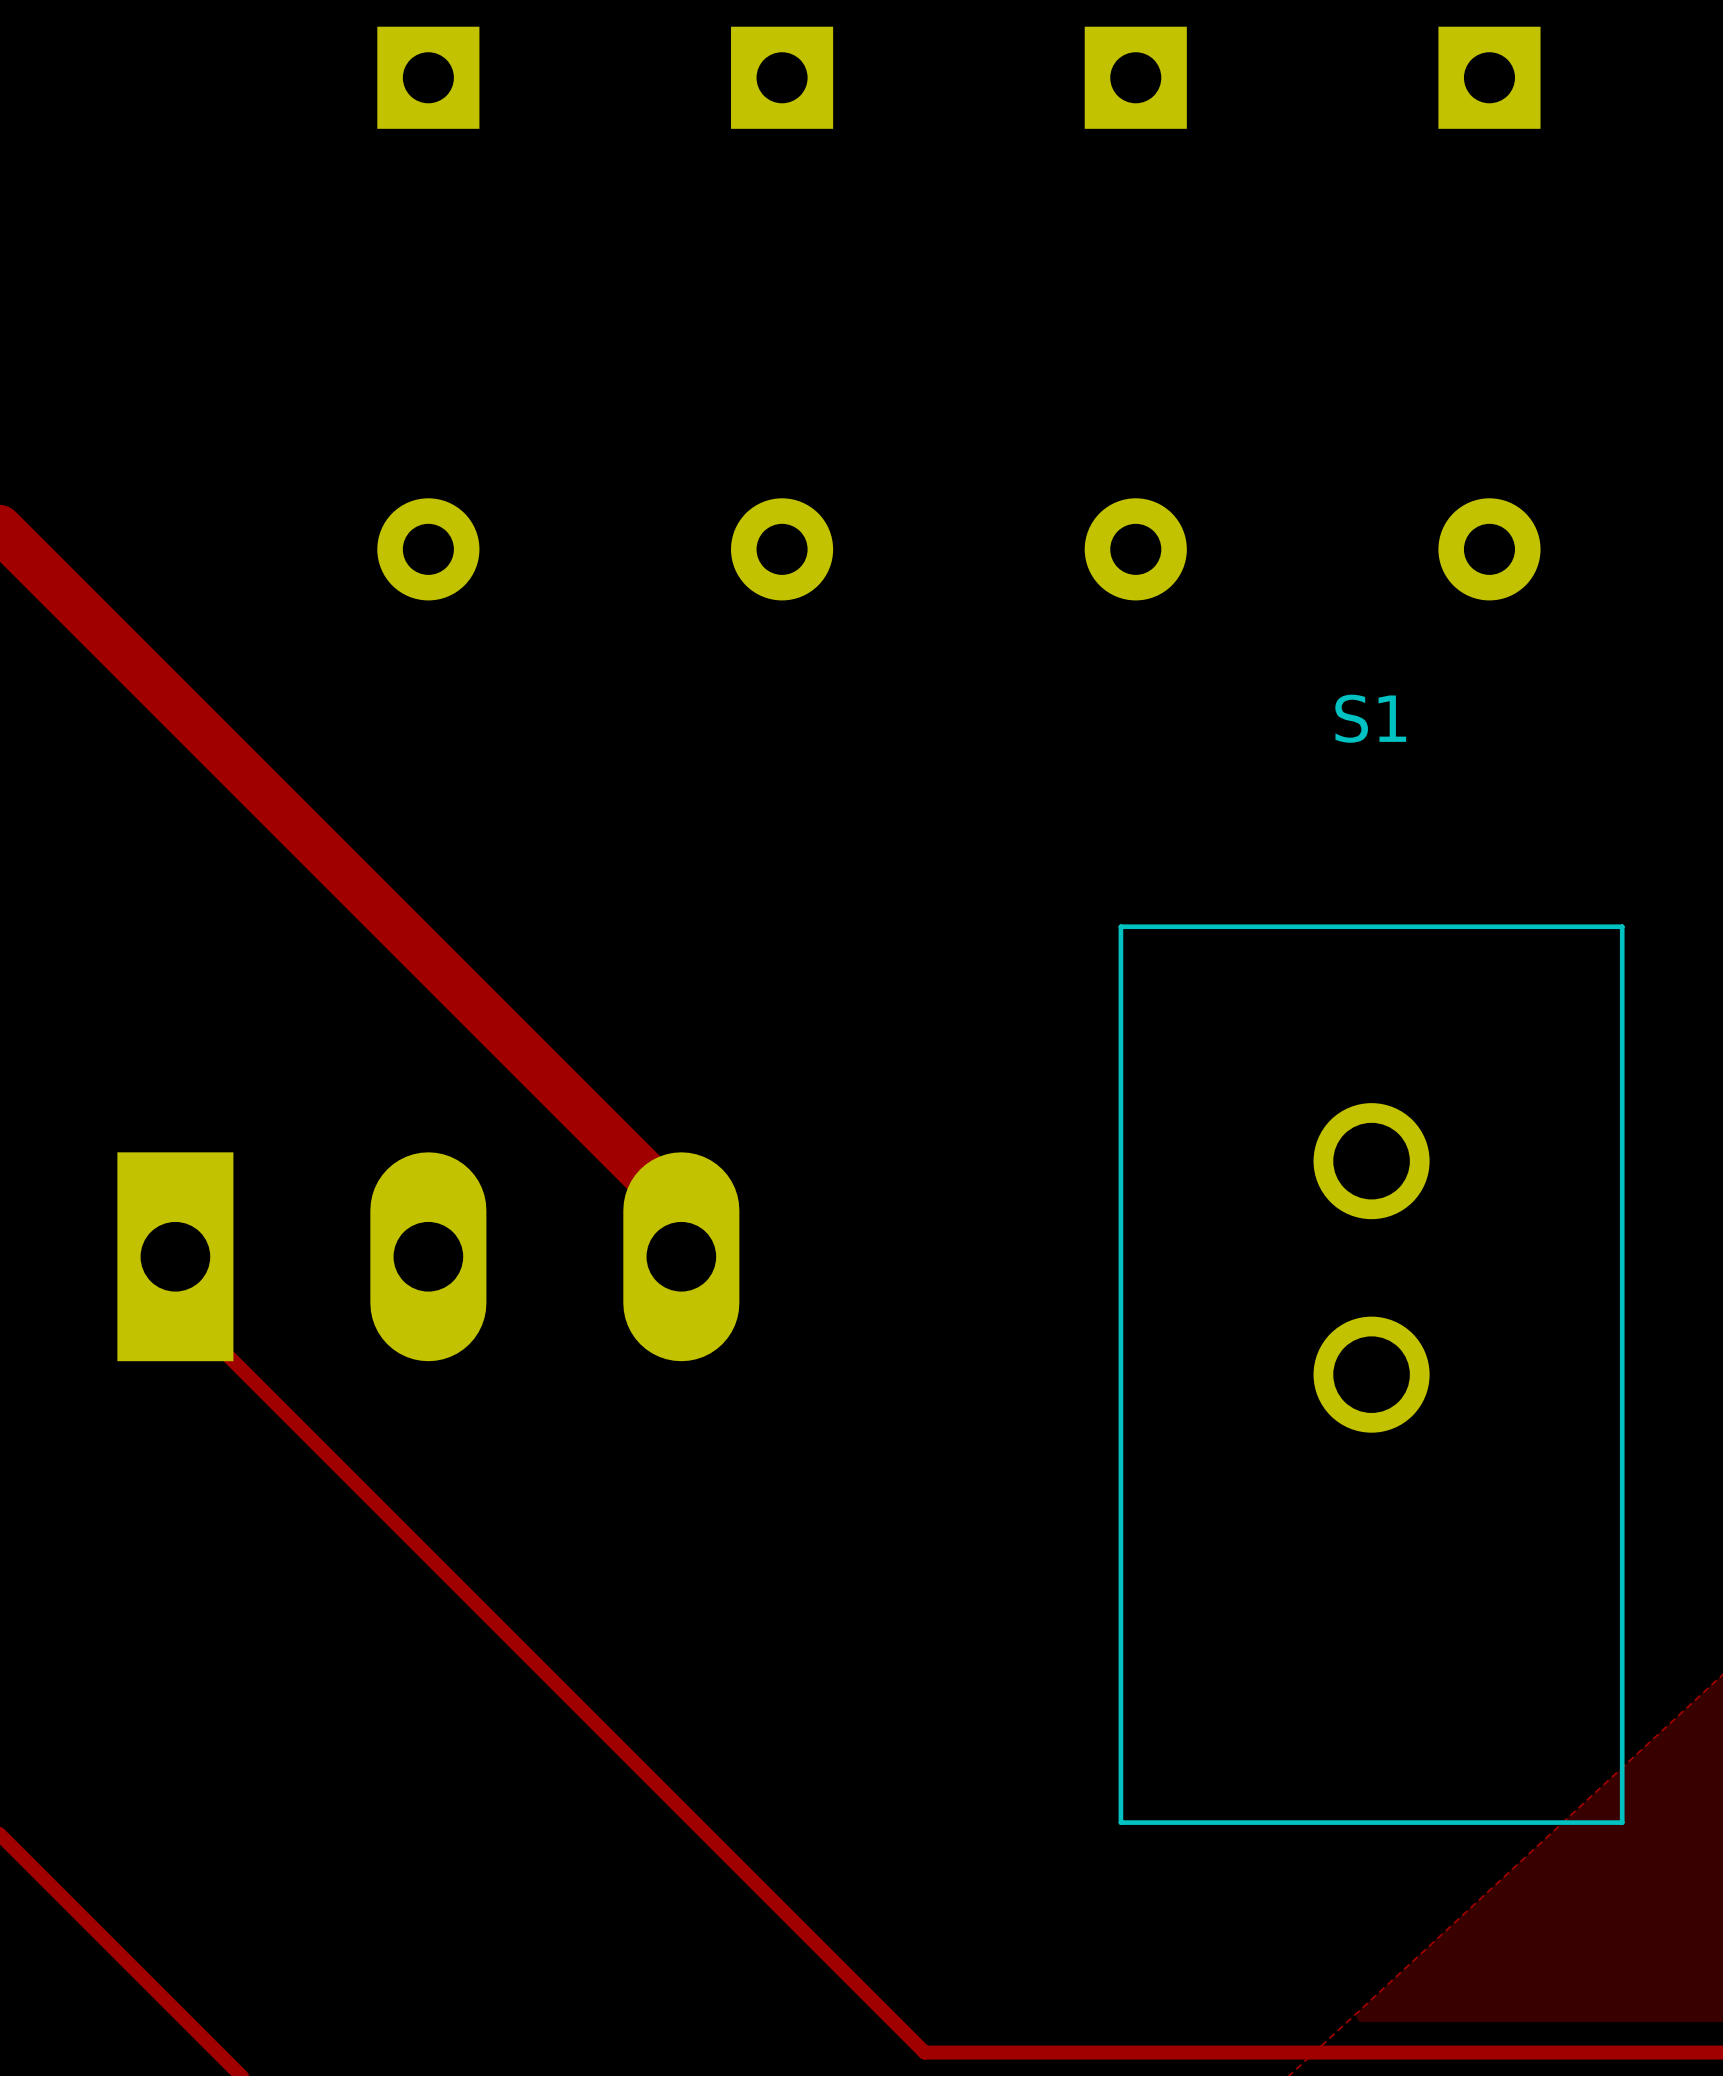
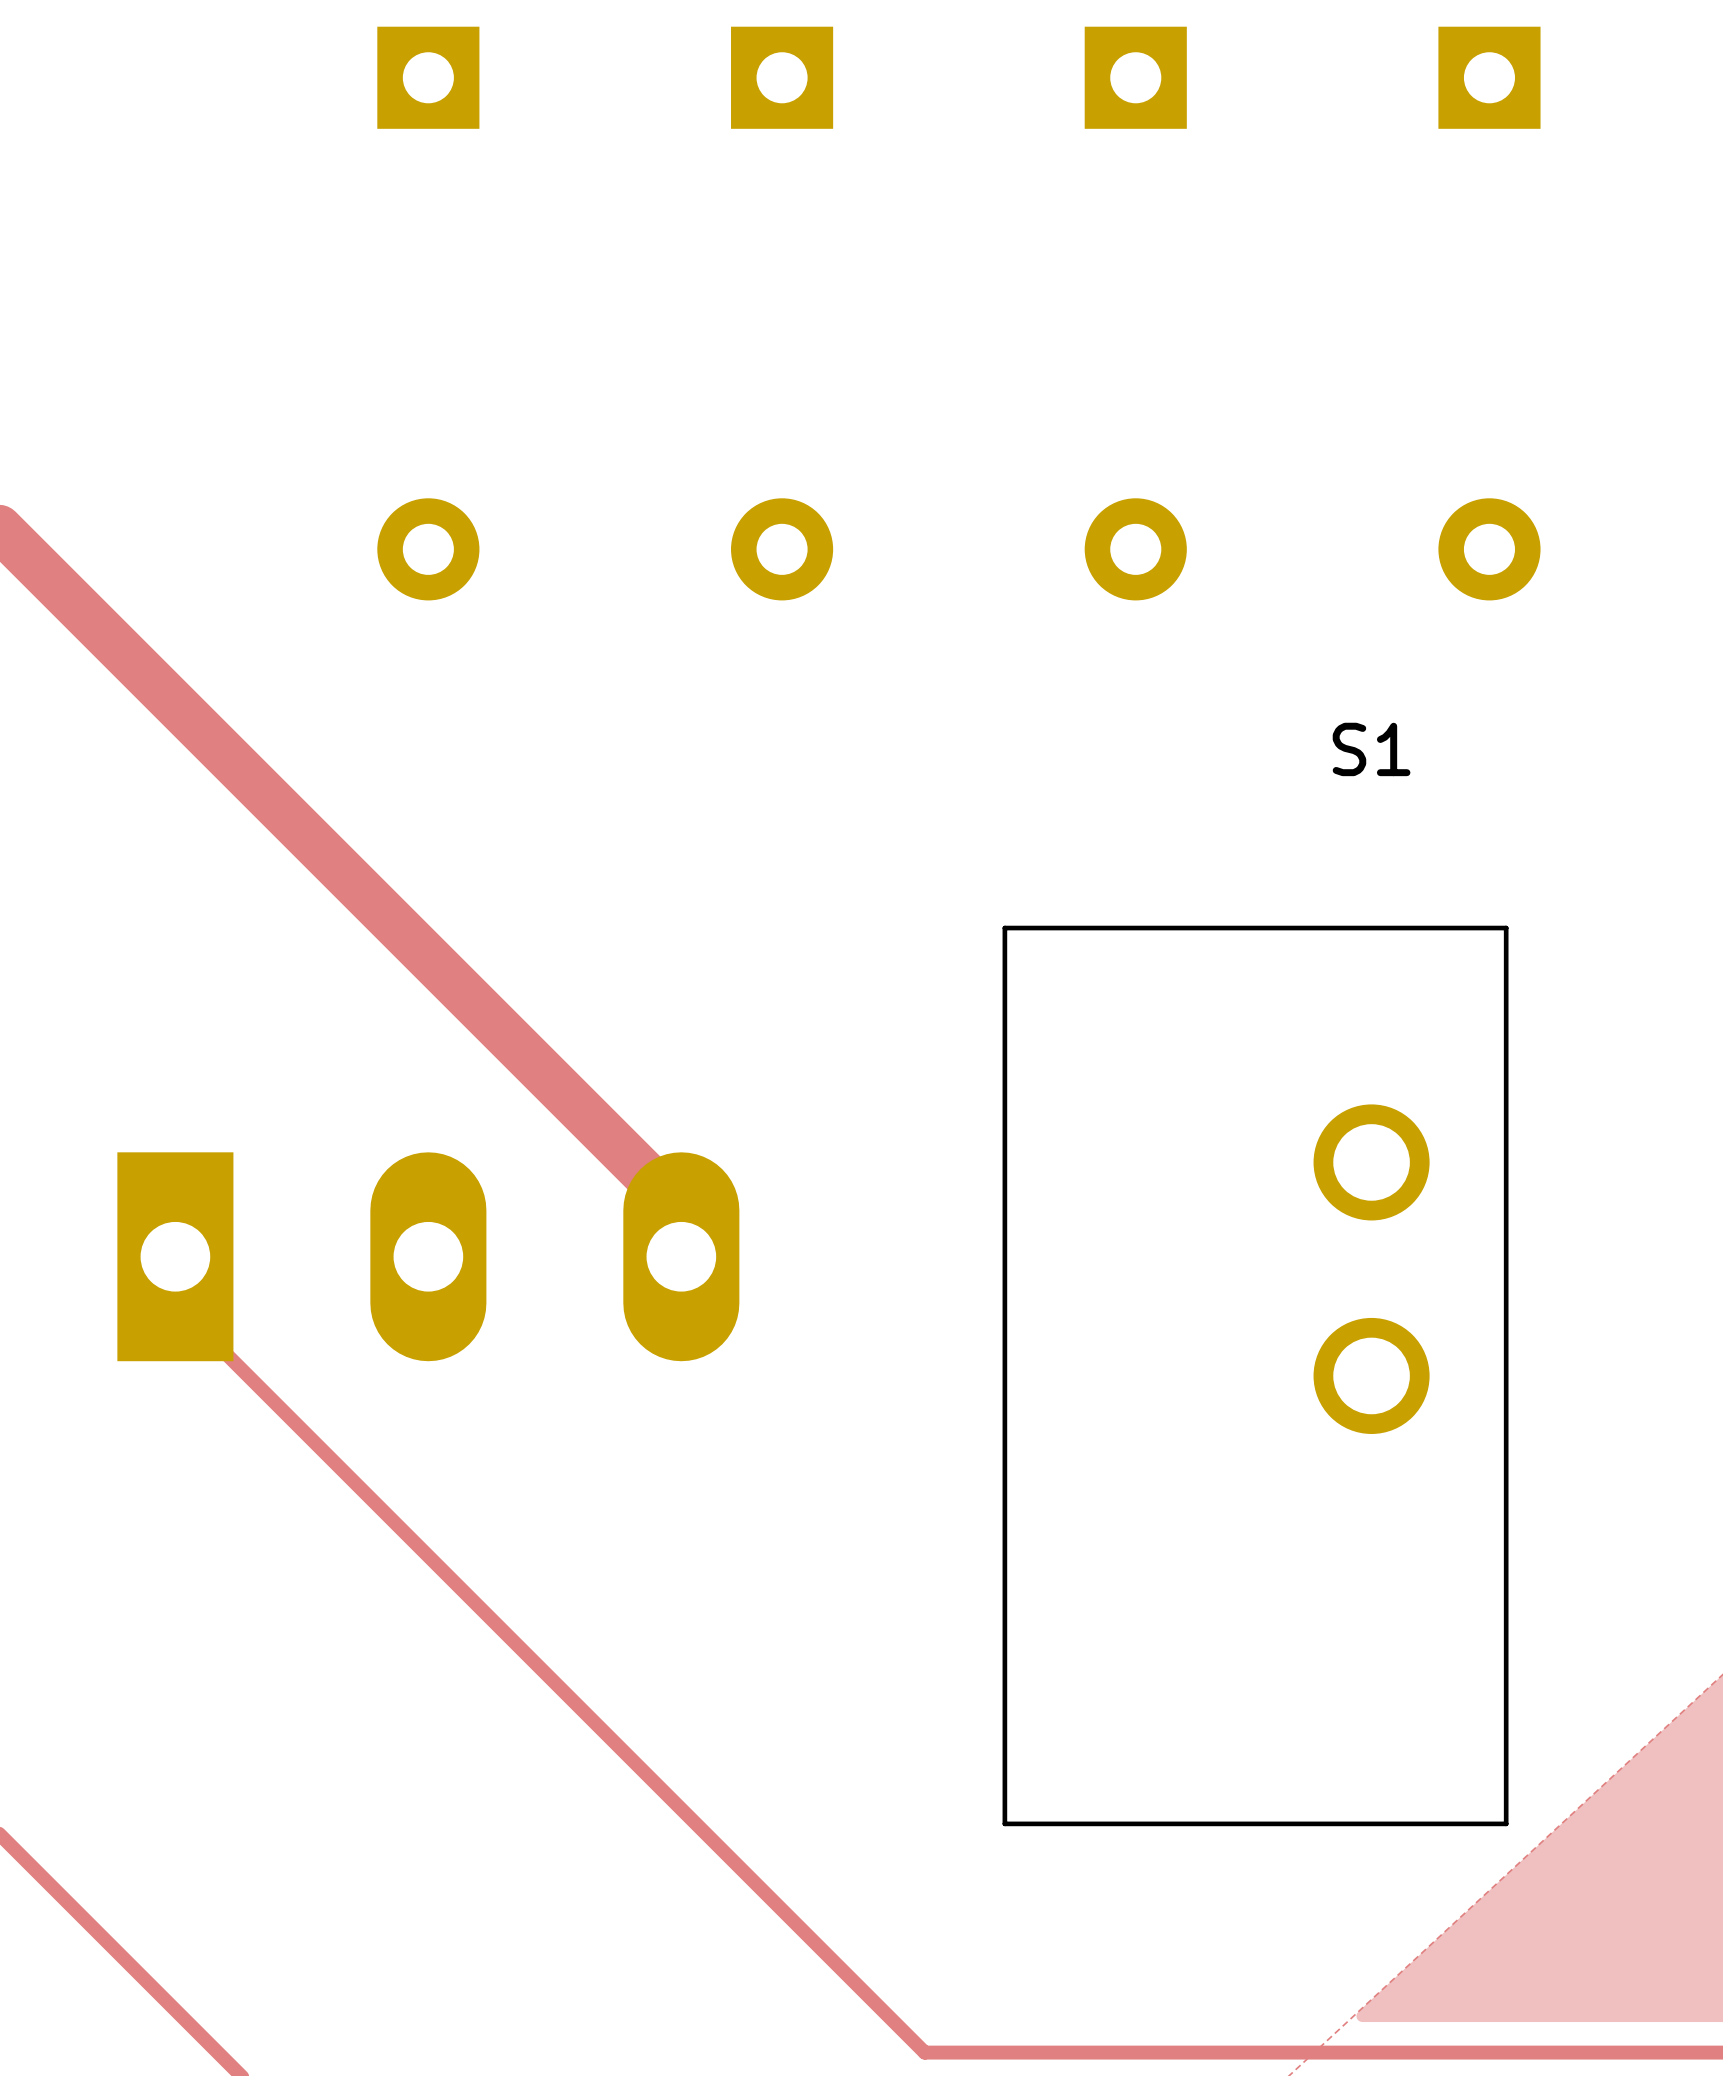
S1 name position: S1 (1370, 718) -> S1 (1371, 749)
S1 footprint: [1118, 924, 1625, 1825] -> [1002, 925, 1509, 1827]

